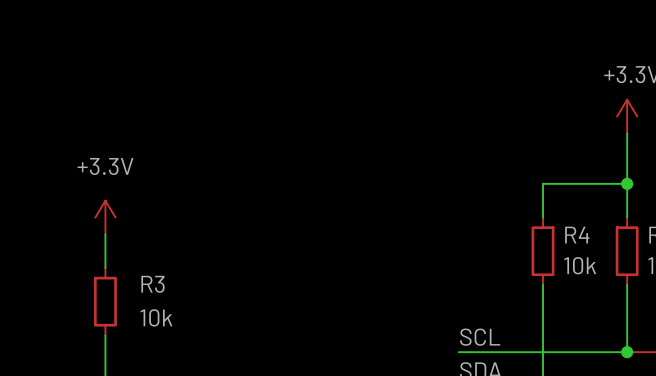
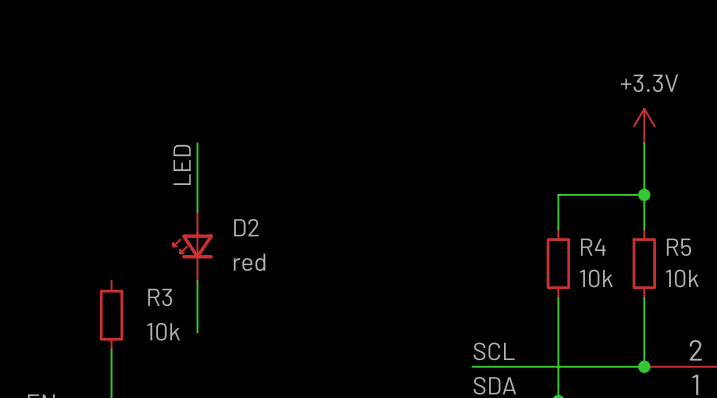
wire: none -> (197, 143) (197, 212)
label: none -> LED (182, 164)
power symbol: +3.3V (105, 217) -> none
wire: (105, 234) (105, 268) -> none
D2: none -> red (193, 246)
wire: none -> (197, 280) (197, 332)

